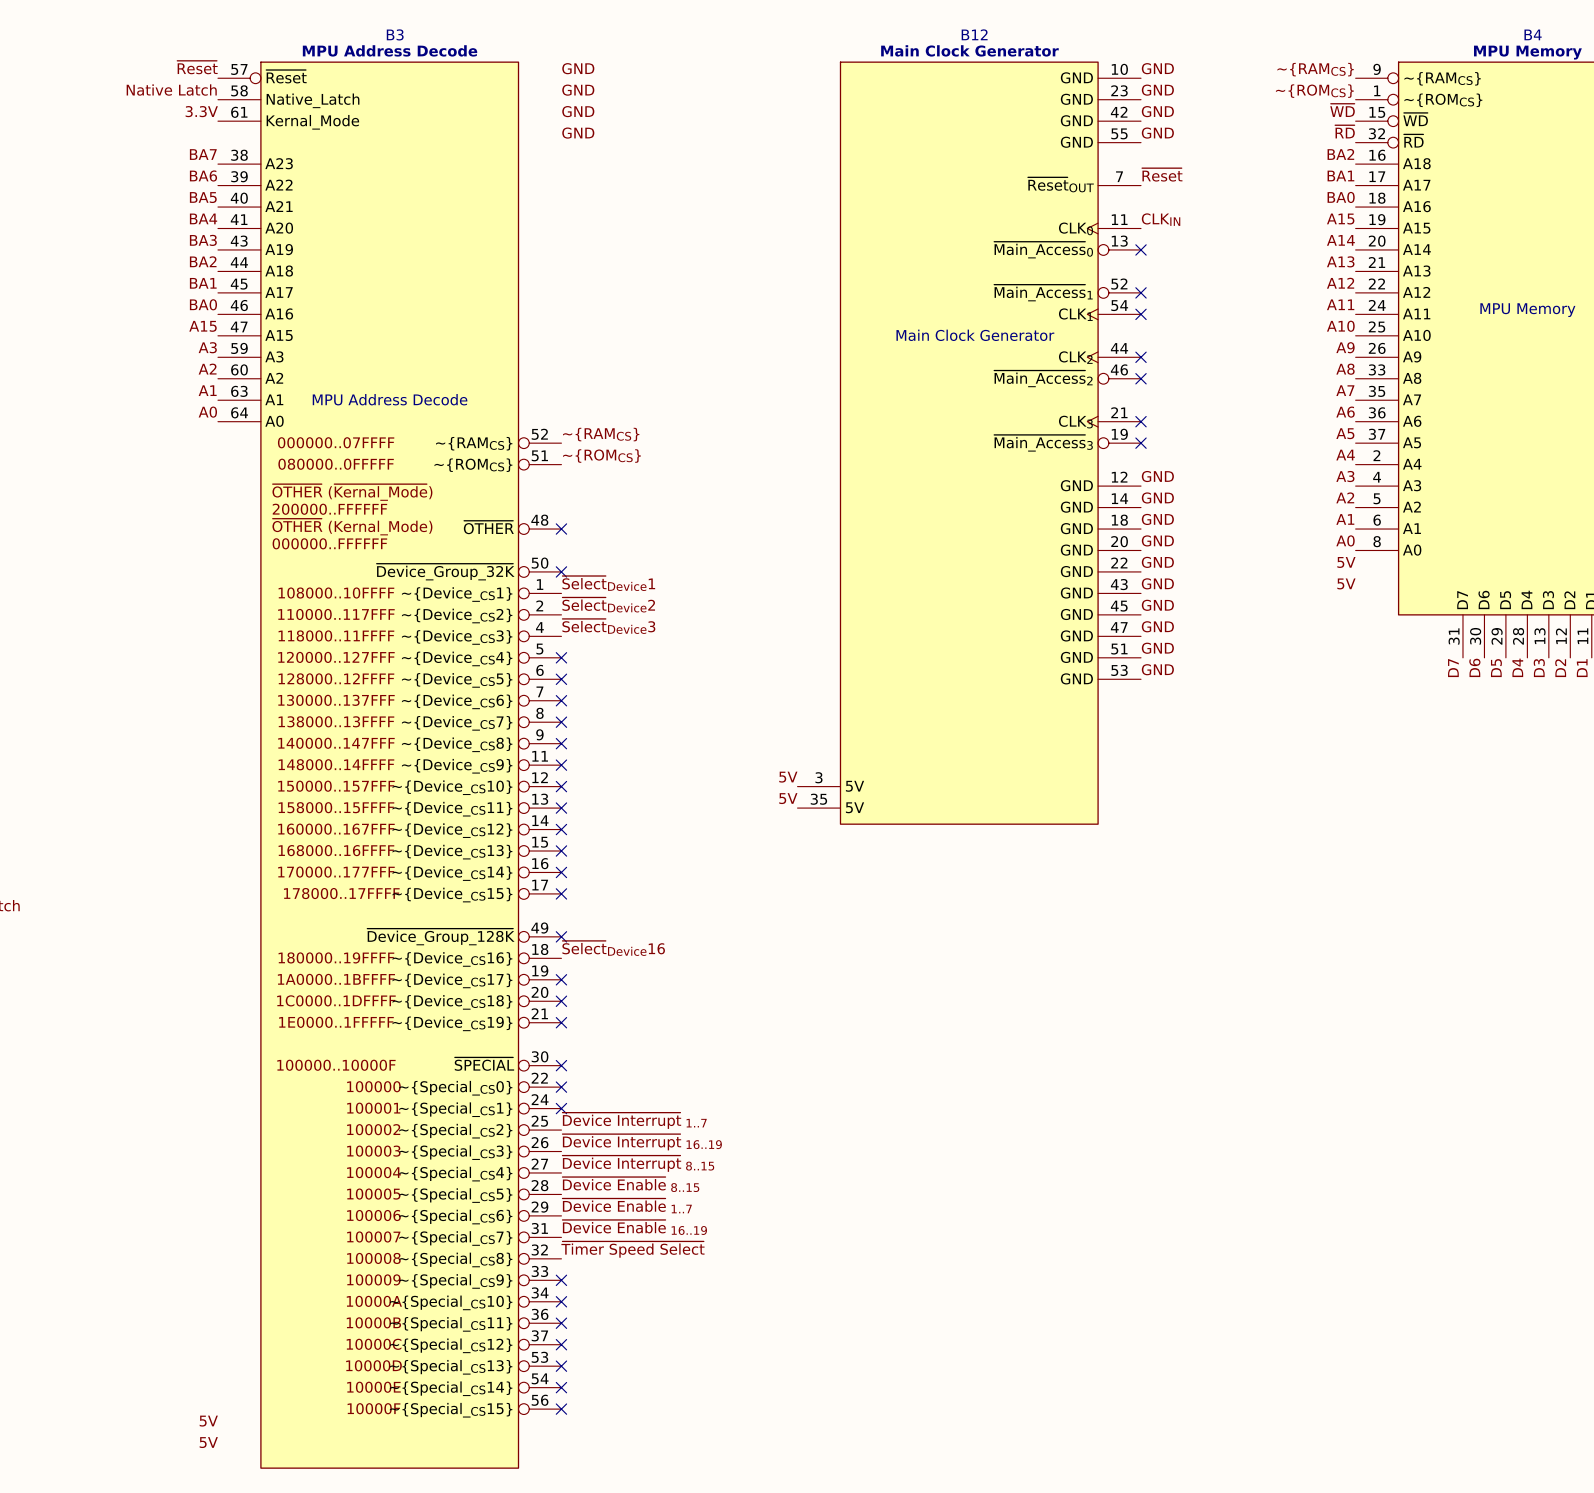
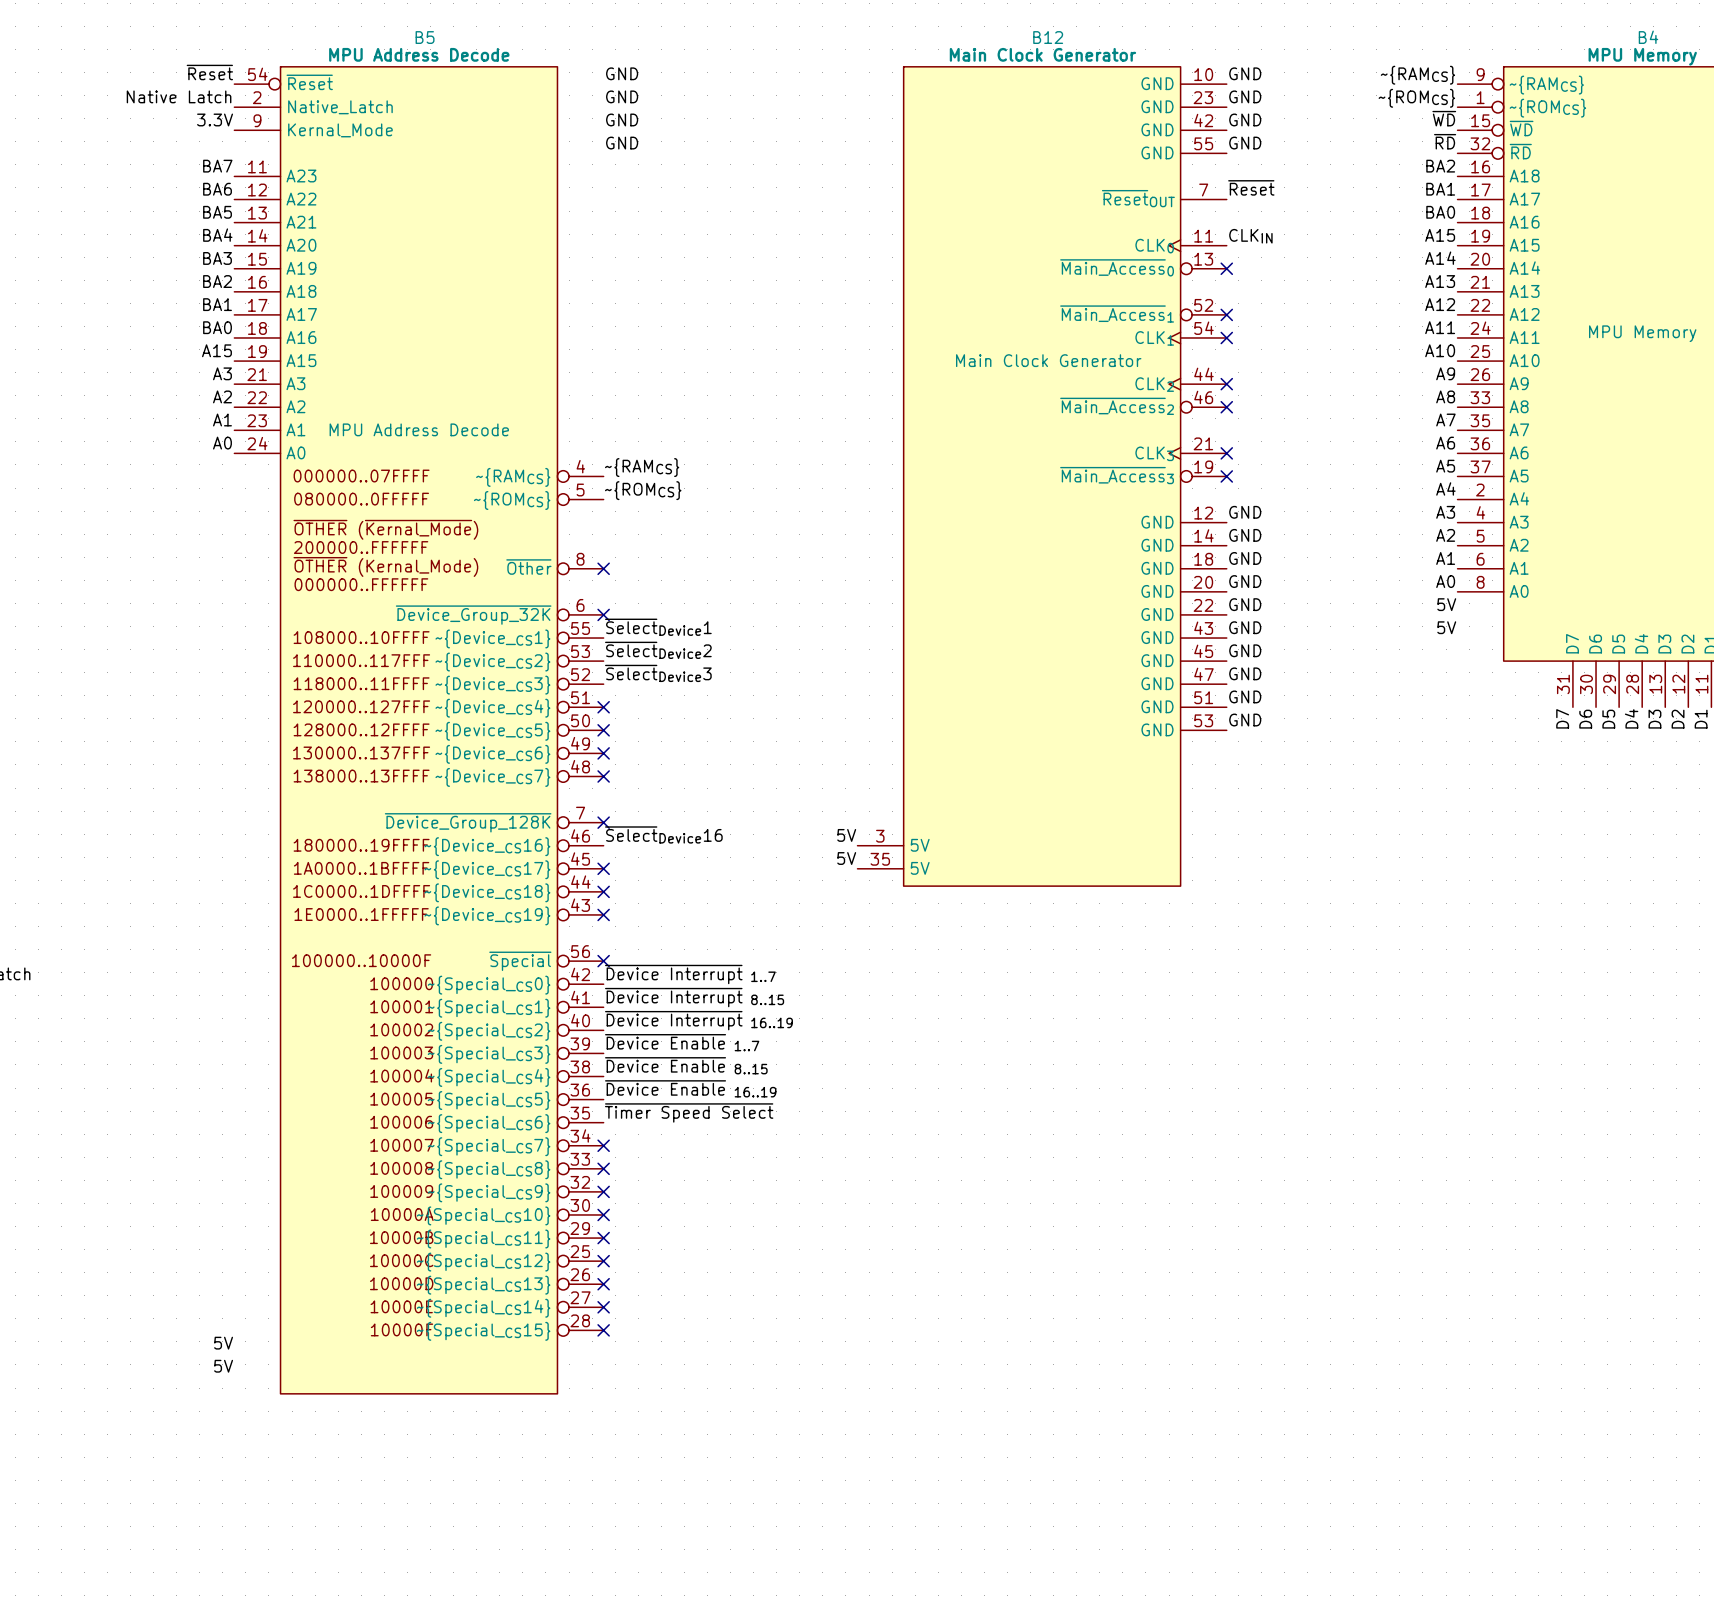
B5: none -> MPU Address Decode (419, 730)
no-connect mark: (561, 743) -> none
B3: MPU Address Decode (389, 765) -> none
label: none -> ~{Select}Device16 (663, 834)
no-connect mark: (561, 786) -> none
no-connect mark: (561, 872) -> none
label: none -> ~{Device Interrupt} 1..7 (690, 974)
label: none -> ~{Device Interrupt} 8..15 (694, 997)
no-connect mark: (561, 936) -> none
label: ~{Select}Device16 (613, 948) -> ~{Device Interrupt} 16..19 (698, 1020)
label: none -> ~{Device Enable} 1..7 (682, 1042)
no-connect mark: (561, 979) -> none
no-connect mark: (561, 1001) -> none
label: none -> ~{Device Enable} 16..19 (690, 1088)
no-connect mark: (561, 1022) -> none
label: none -> ~{Timer Speed Select} (689, 1112)
label: ~{Device Interrupt} 1..7 (634, 1120) -> none
no-connect mark: none -> (603, 1214)
label: ~{Device Interrupt} 16..19 (642, 1142) -> none
no-connect mark: none -> (603, 1238)
label: ~{Device Interrupt} 8..15 (638, 1163) -> none
no-connect mark: none -> (603, 1261)
label position: ~{Device Enable} 8..15 (630, 1184) -> ~{Device Enable} 8..15 (686, 1065)
no-connect mark: none -> (603, 1284)
label: ~{Device Enable} 1..7 (627, 1205) -> none
no-connect mark: none -> (603, 1307)
label: ~{Device Enable} 16..19 (634, 1227) -> none
no-connect mark: none -> (603, 1330)
label: none -> 5V (223, 1343)
label: ~{Timer Speed Select} (632, 1249) -> none
label: none -> 5V (223, 1366)
no-connect mark: (561, 1280) -> none
no-connect mark: (561, 1301) -> none
no-connect mark: (561, 1323) -> none
no-connect mark: (561, 1344) -> none
no-connect mark: (561, 1366) -> none
no-connect mark: (561, 1387) -> none
no-connect mark: (561, 1409) -> none
label: 5V (208, 1421) -> none
label: 5V (208, 1442) -> none

